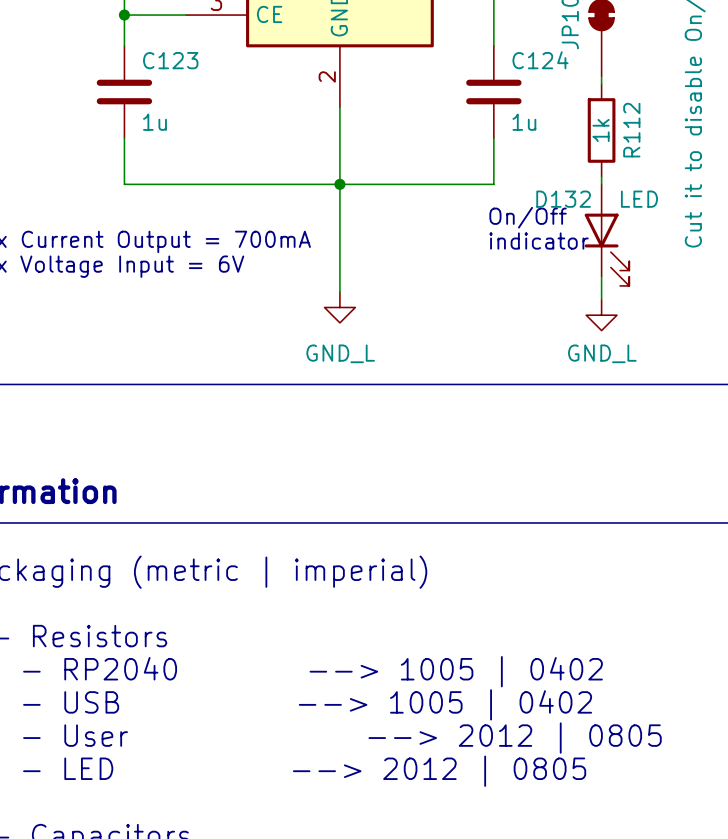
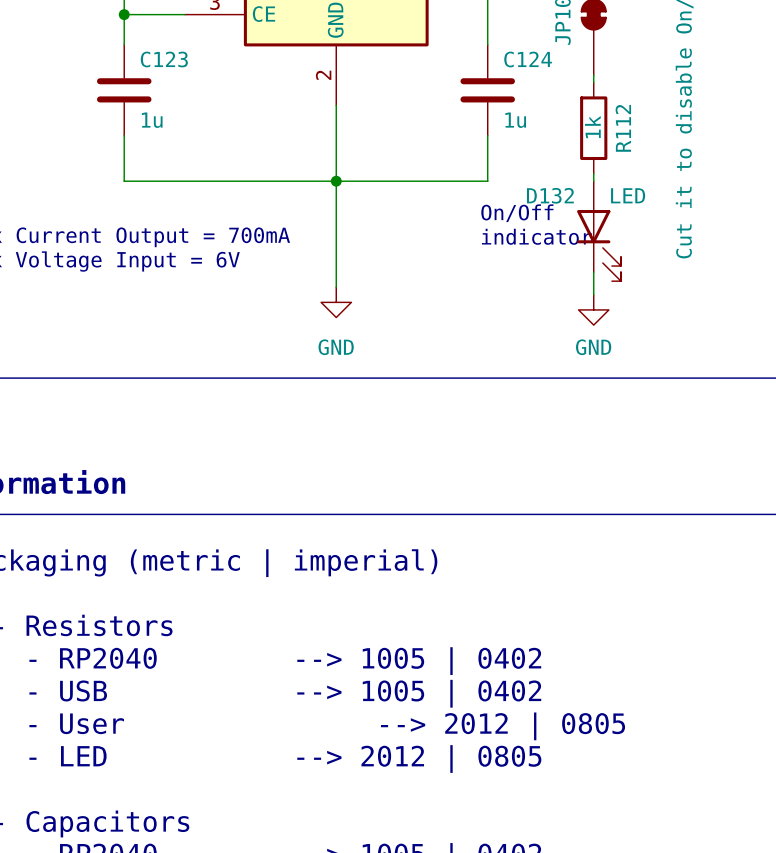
power symbol: GND_L (339, 307) -> GND (336, 302)
power symbol: GND_L (601, 315) -> GND (593, 309)

